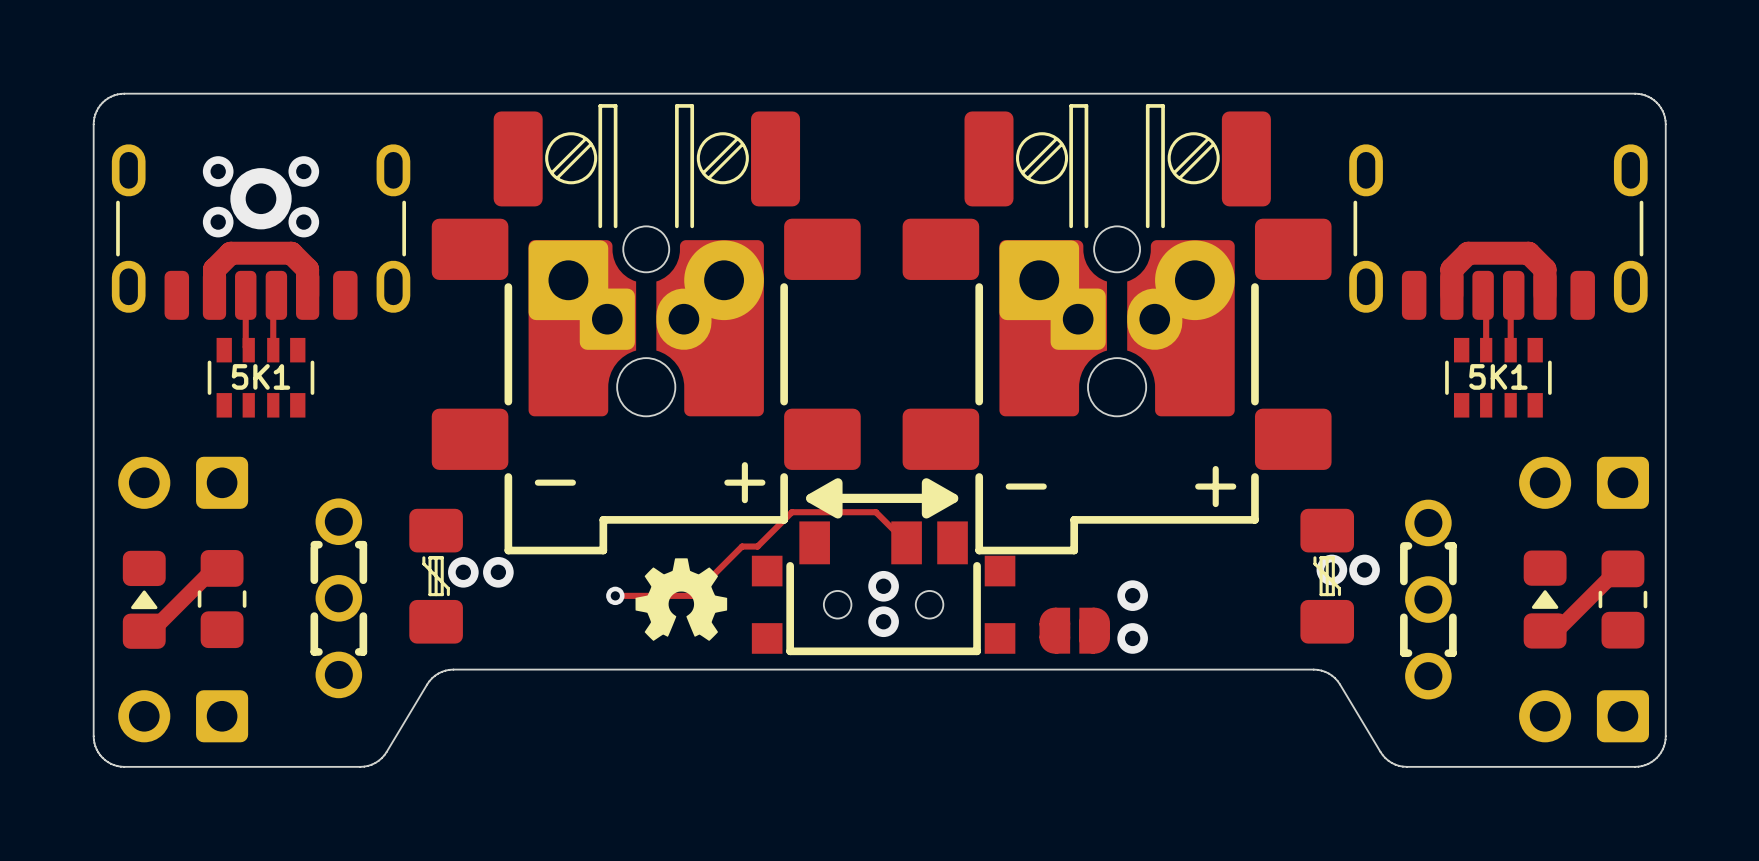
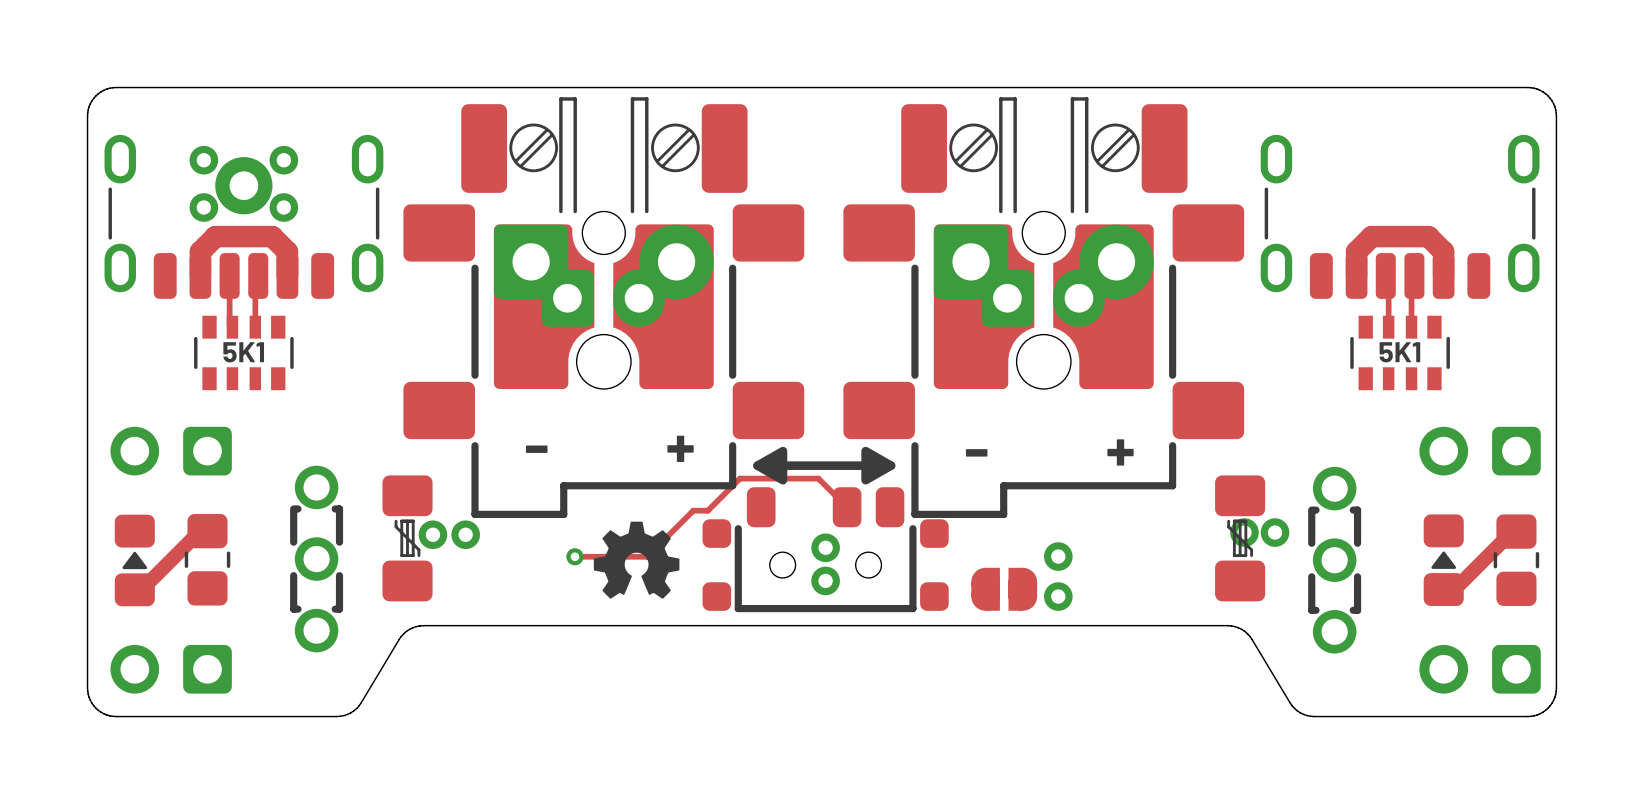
part footprint: [751, 521, 1016, 656] -> [702, 487, 949, 613]

